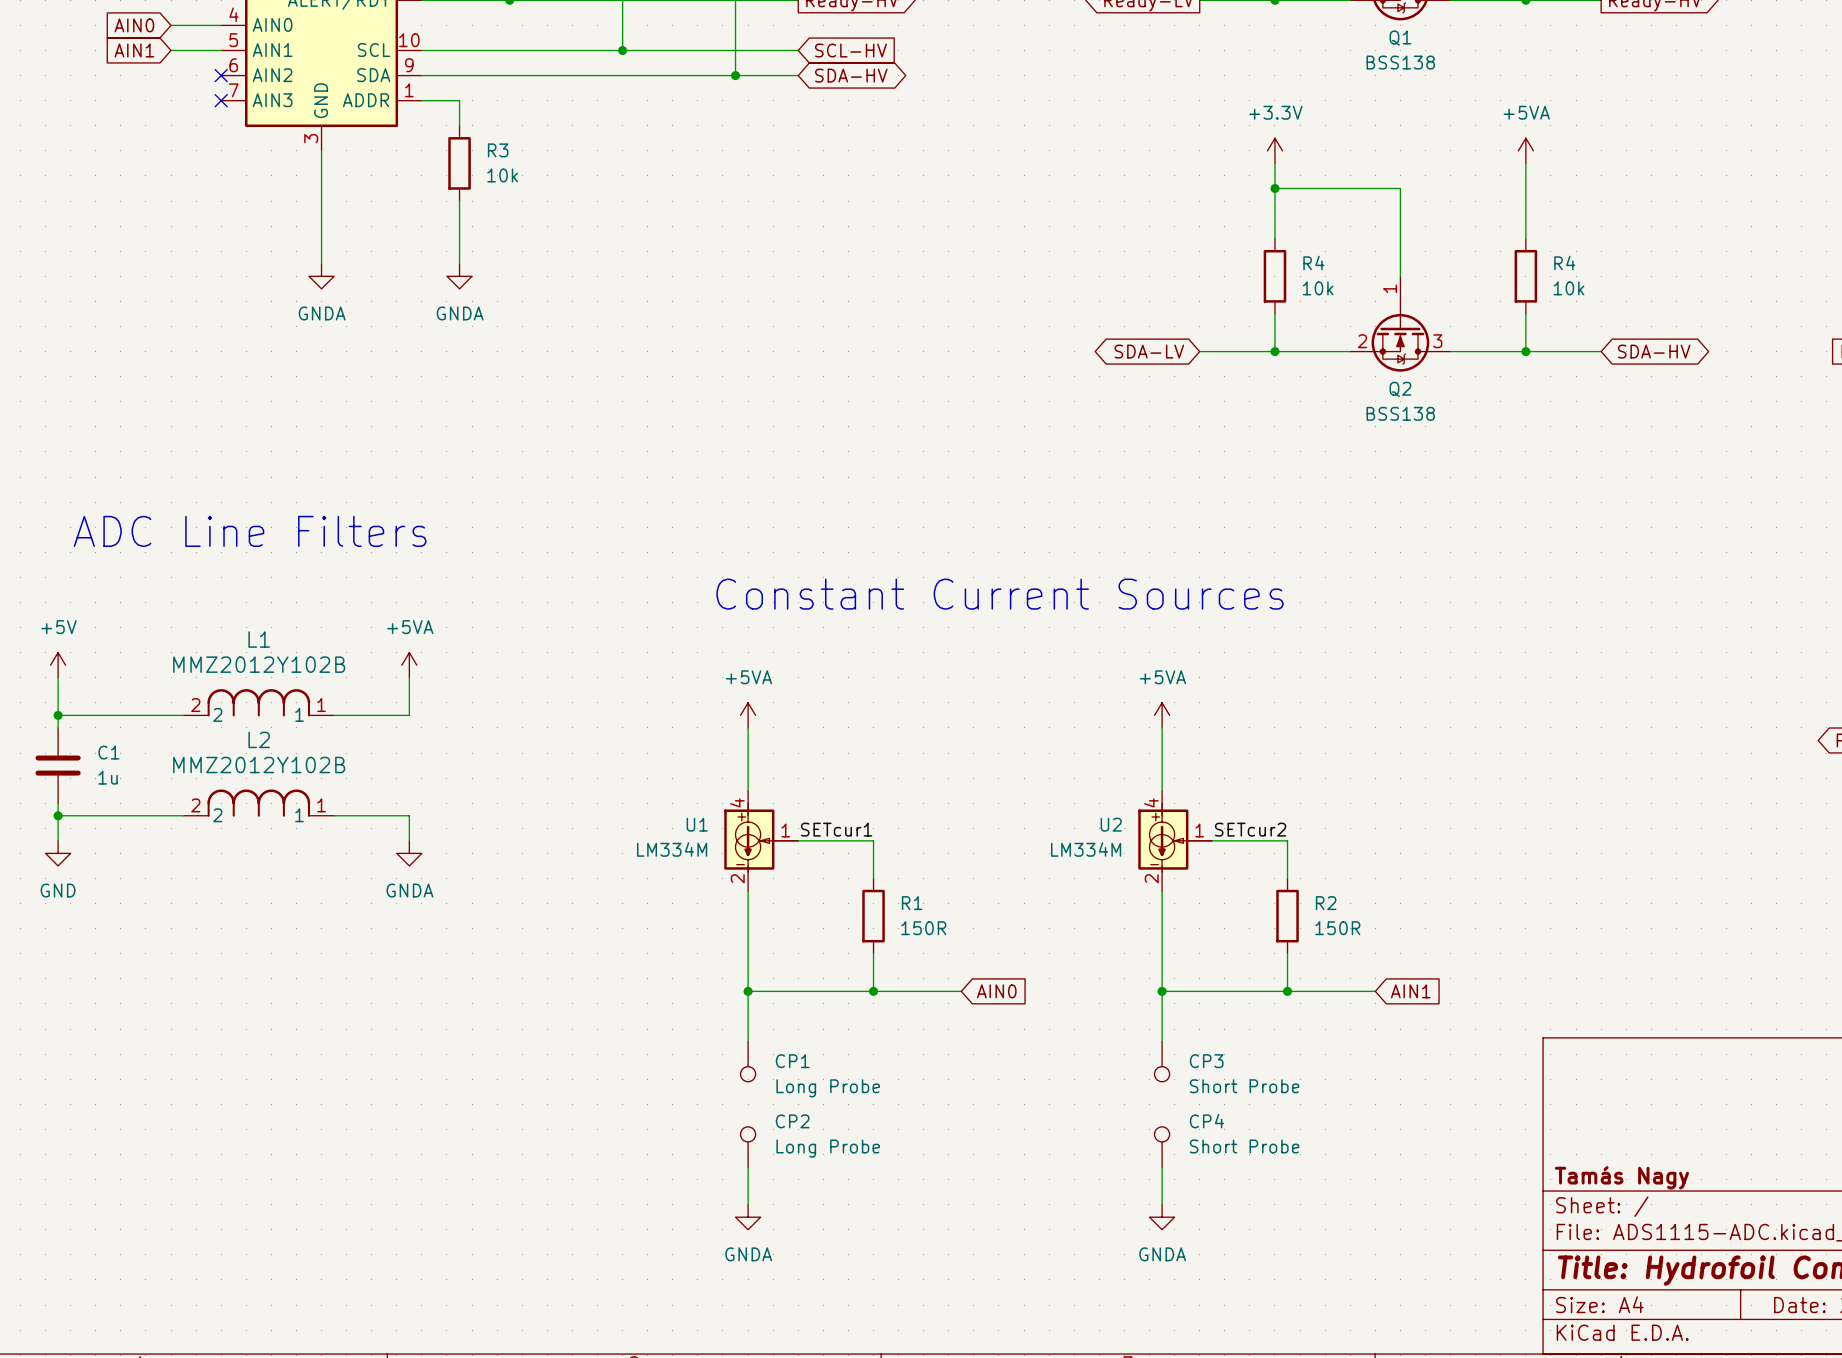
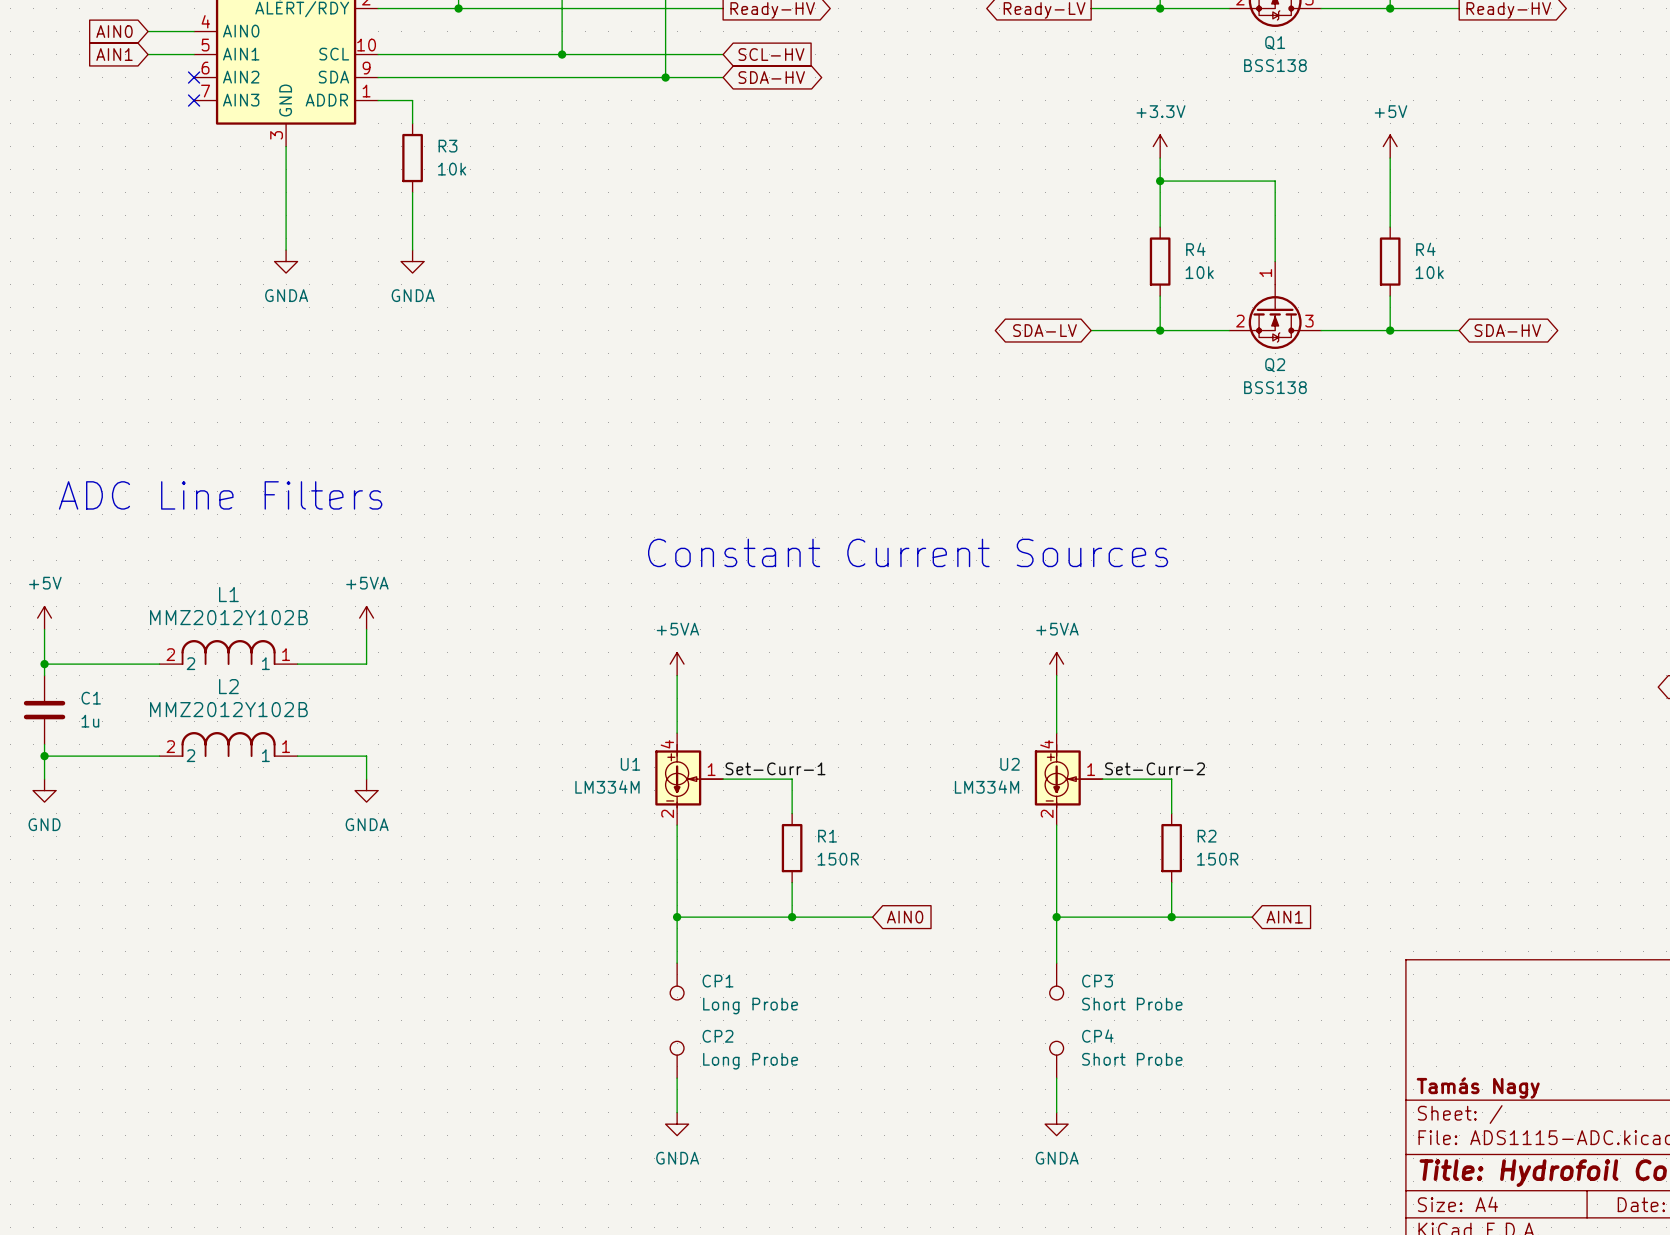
power symbol: +5VA (1525, 150) -> +5V (1390, 146)
label: SETcur1 (836, 829) -> Set-Curr-1 (775, 768)
label: SETcur2 (1250, 829) -> Set-Curr-2 (1155, 768)

